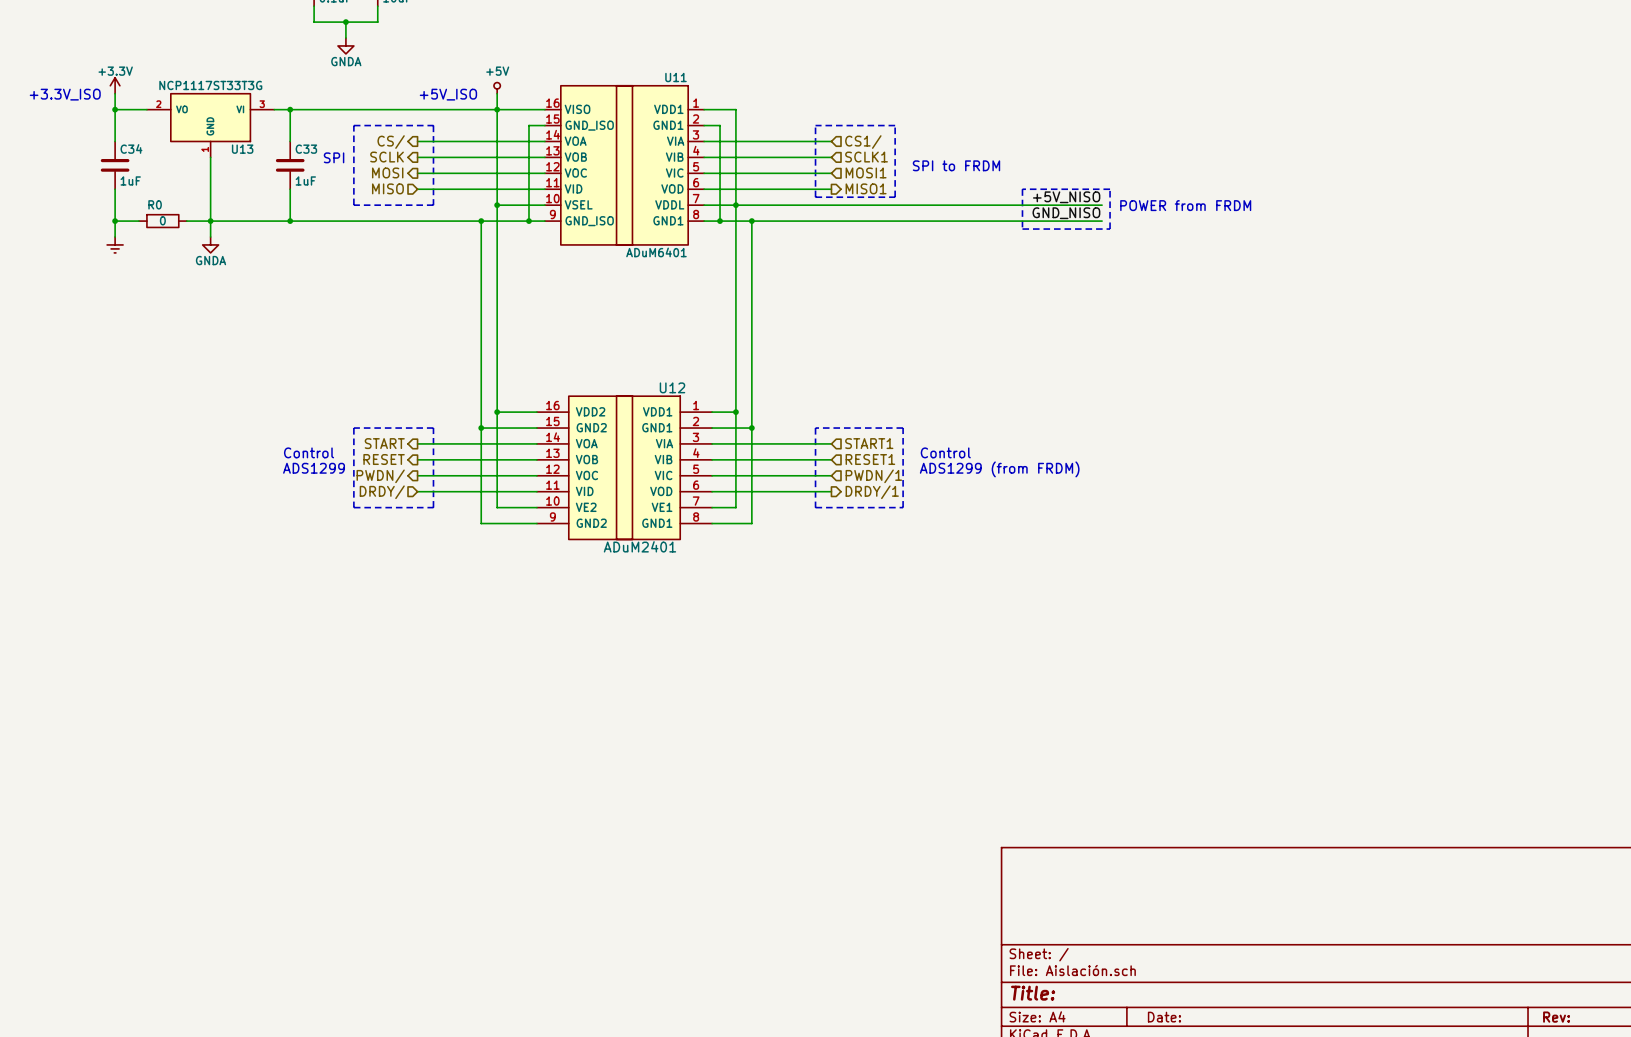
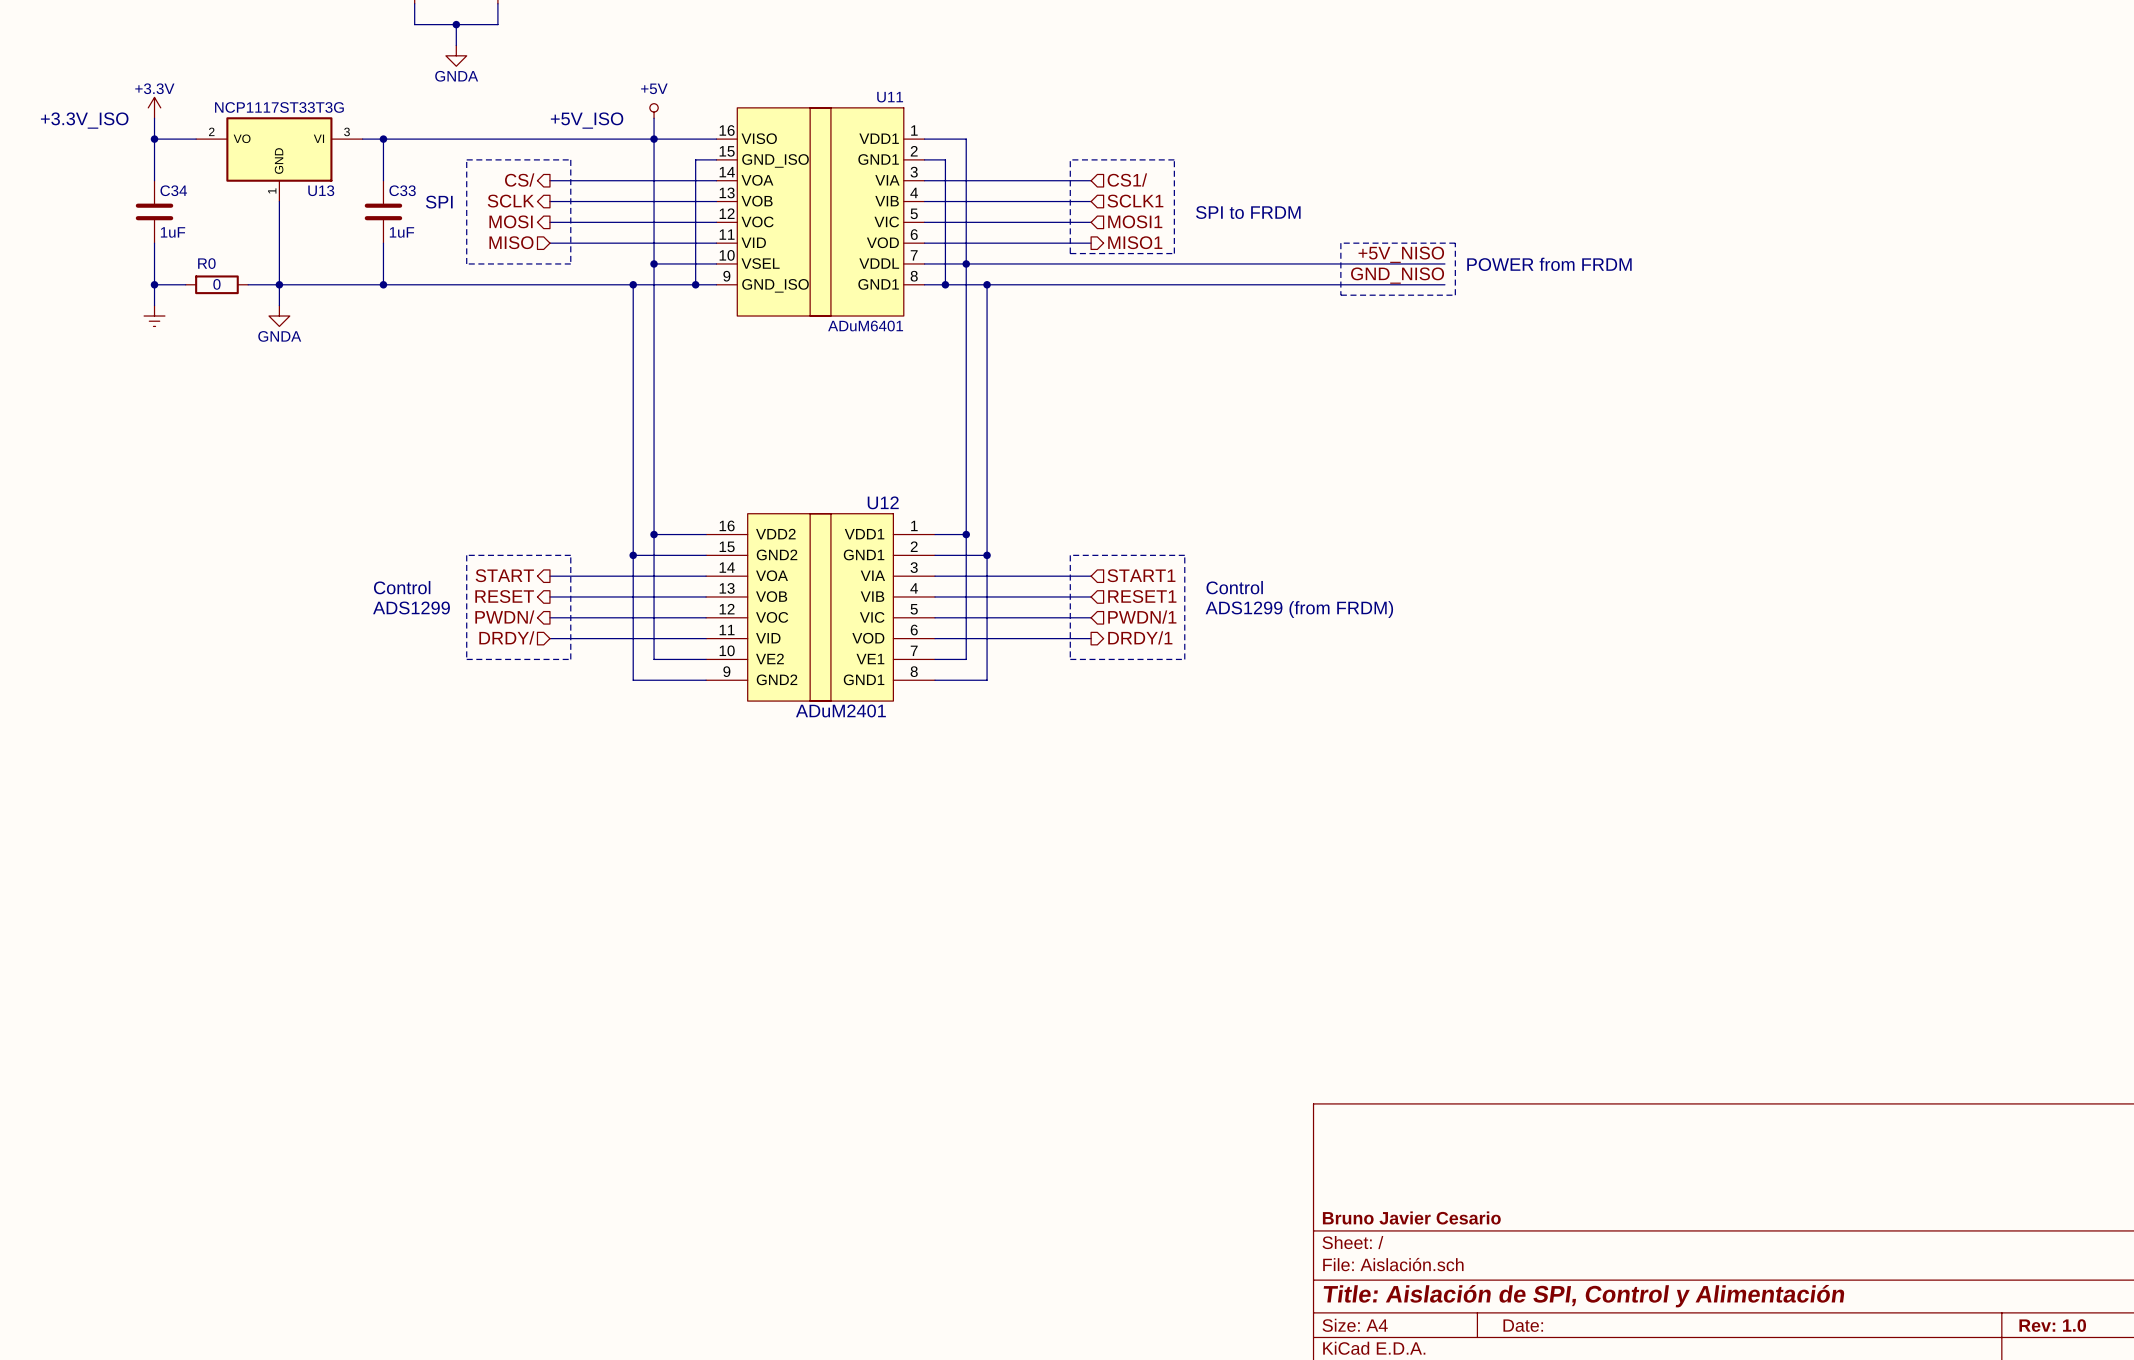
title block: none -> Bruno Javier Cesario (1411, 1217)
title block: Title: (1033, 993) -> Title: Aislación de SPI, Control y Alimentación (1584, 1296)
title block: Rev: (1556, 1017) -> Rev: 1.0 (2052, 1325)

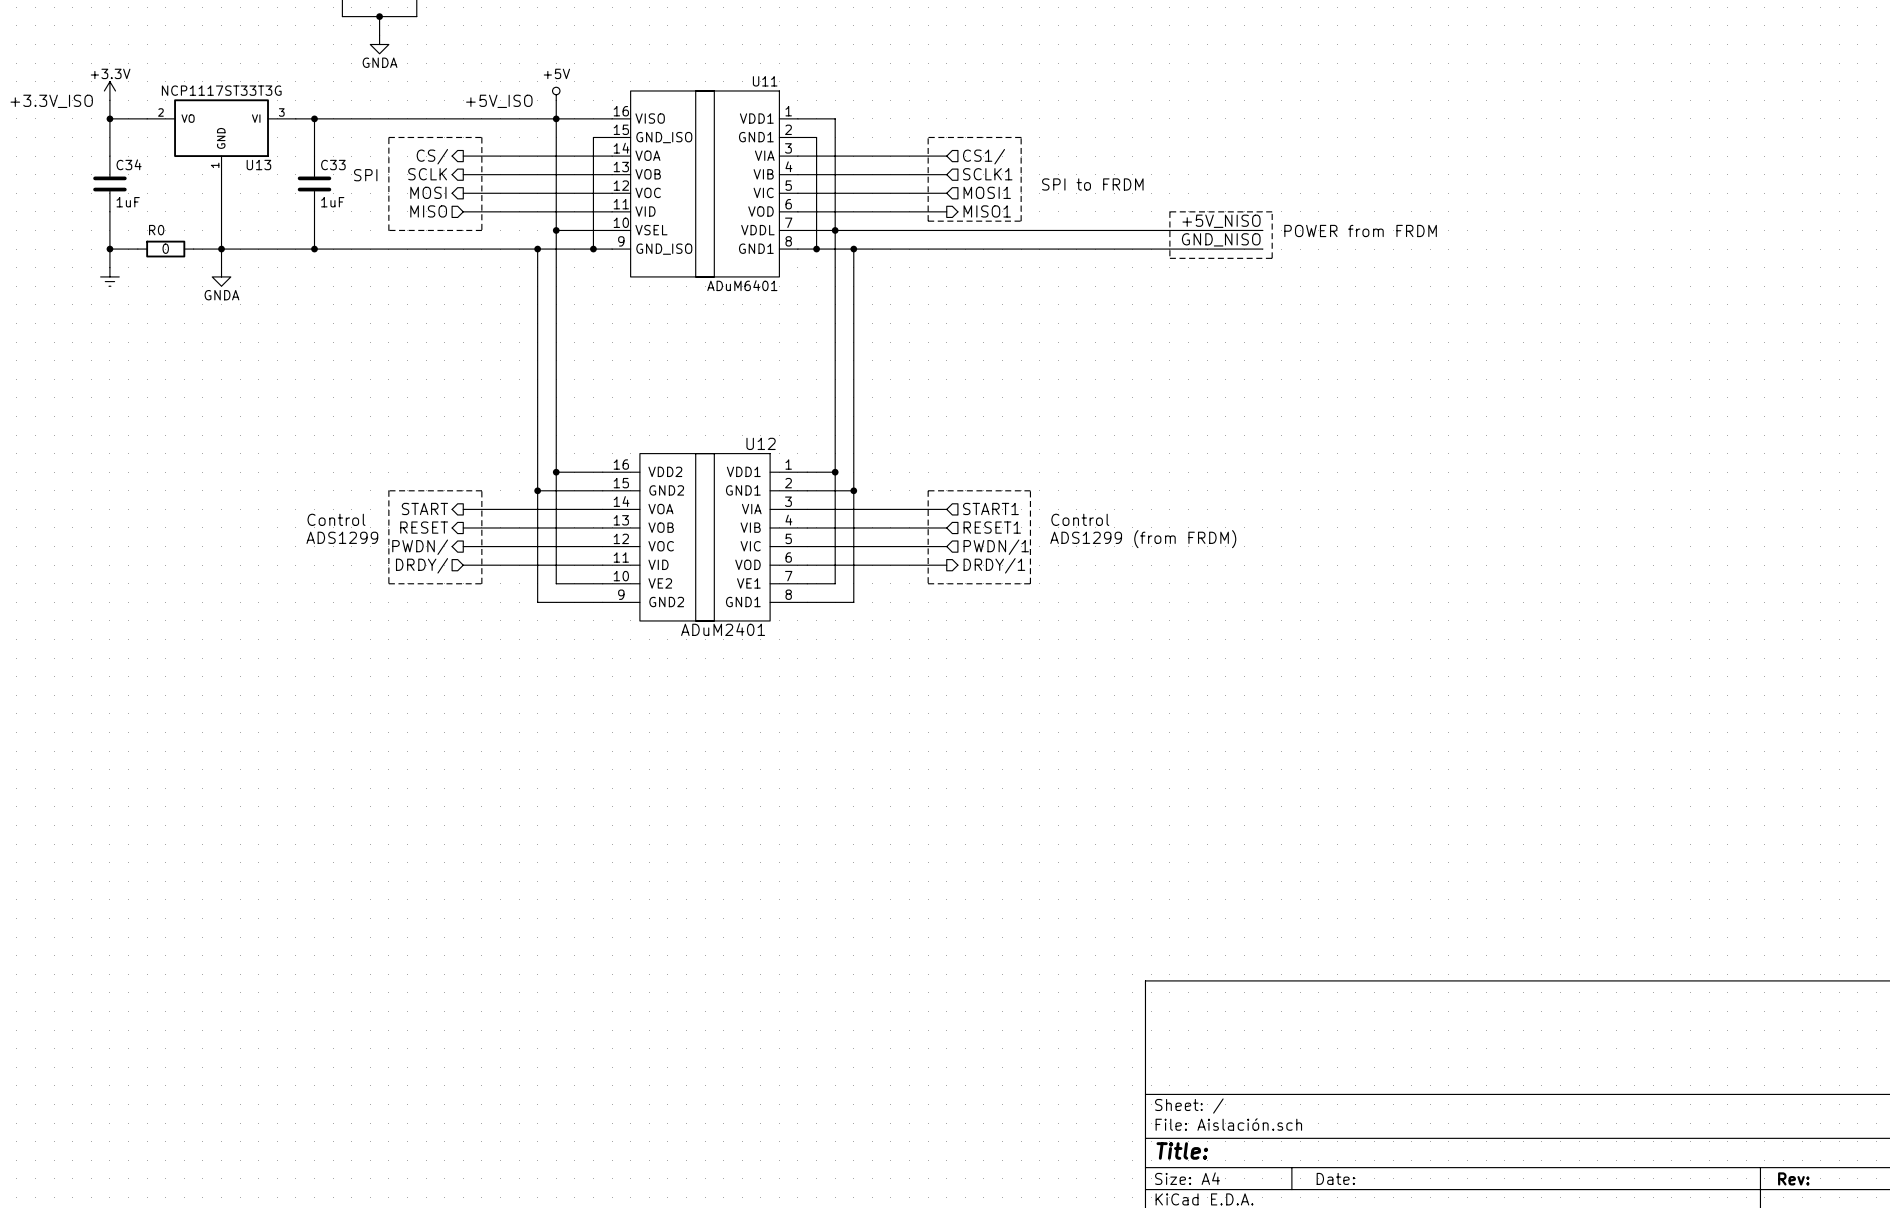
title block: Bruno Javier Cesario (1411, 1217) -> none
title block: Title: Aislación de SPI, Control y Alimentación (1584, 1296) -> Title: (1182, 1150)
title block: Rev: 1.0 (2052, 1325) -> Rev: (1793, 1178)

